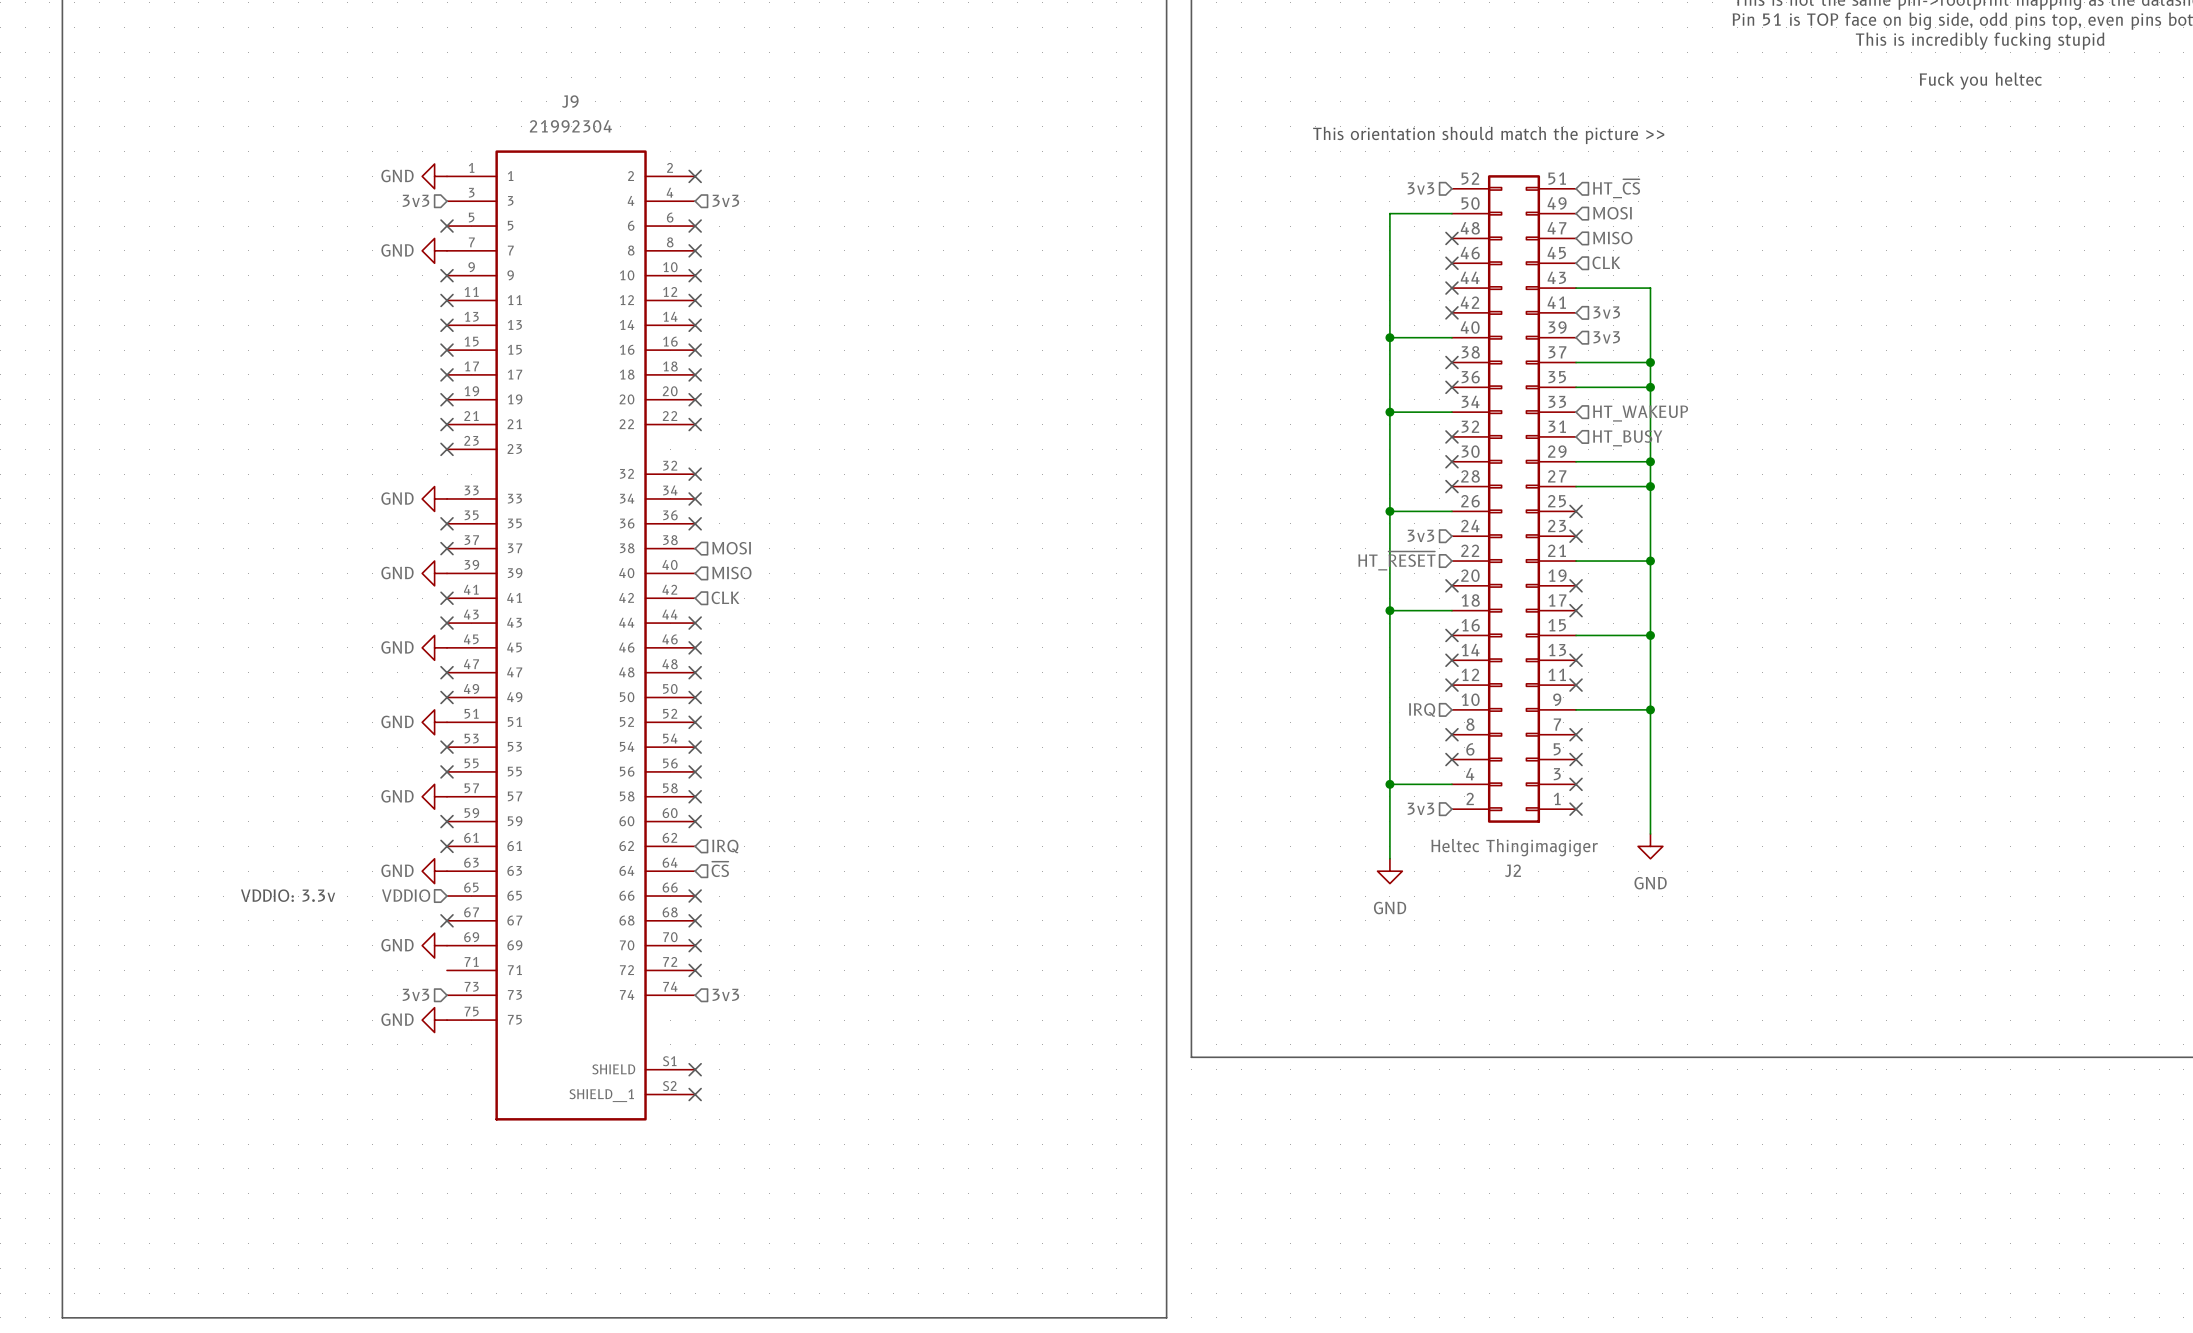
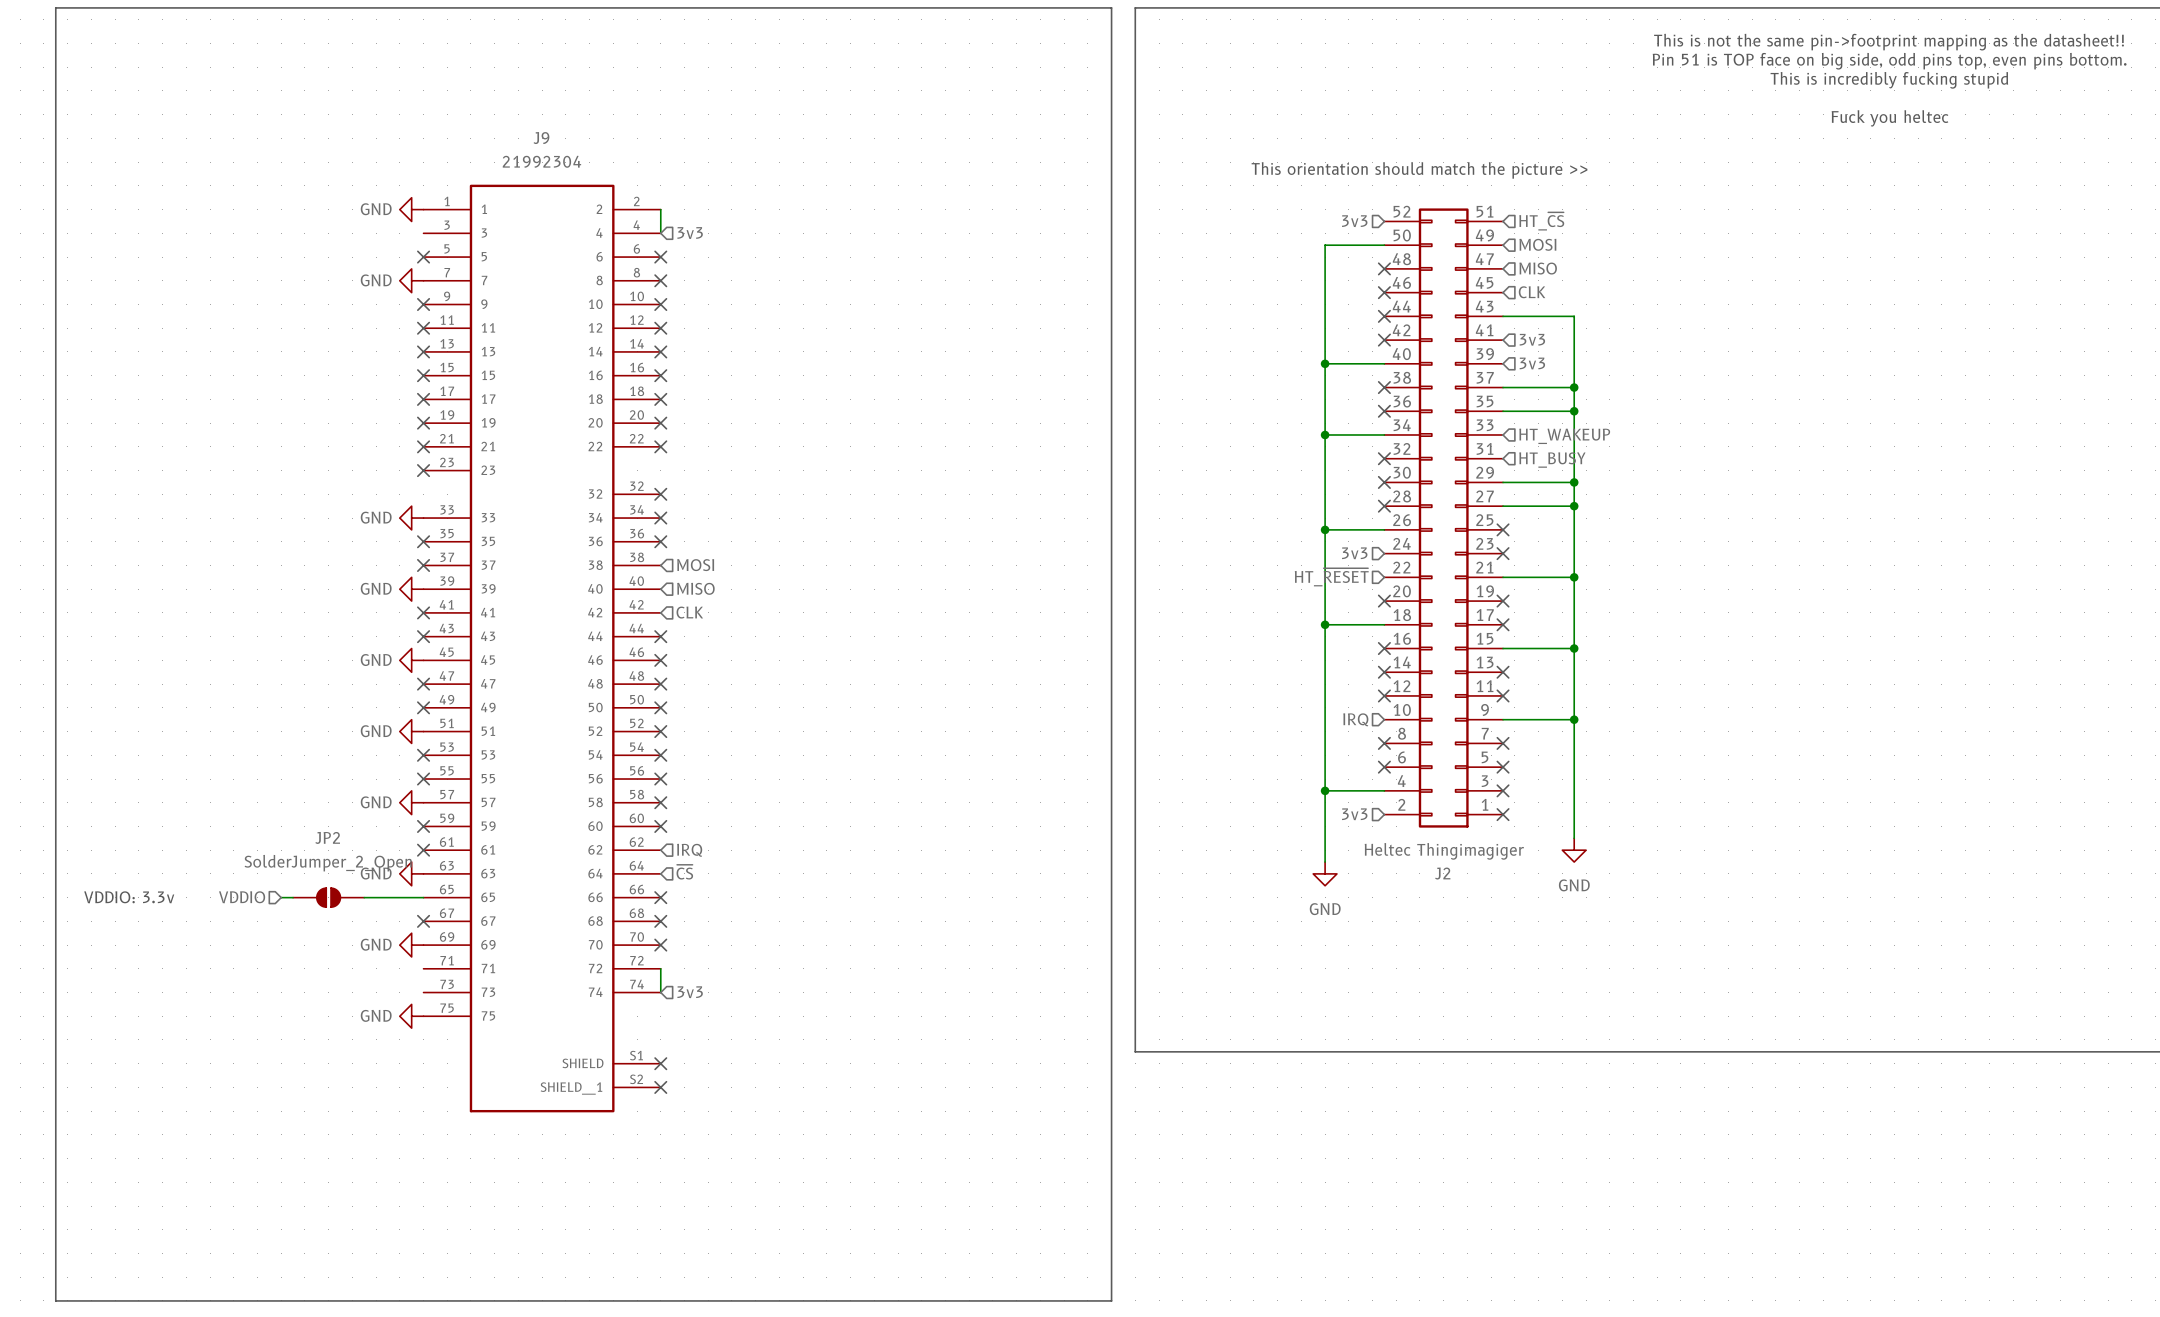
wire: none -> (660, 209) (660, 233)
no-connect mark: (695, 176) -> none
hierarchical label: 3v3 (415, 200) -> none
text position: VDDIO: 3.3v (288, 895) -> VDDIO: 3.3v (129, 897)
hierarchical label position: VDDIO (406, 895) -> VDDIO (242, 897)
wire: none -> (281, 897) (293, 897)
JP2: none -> SolderJumper_2_Open (328, 897)
wire: none -> (364, 897) (423, 897)
wire: none -> (660, 968) (660, 992)
no-connect mark: (695, 970) -> none
hierarchical label: 3v3 (415, 994) -> none

